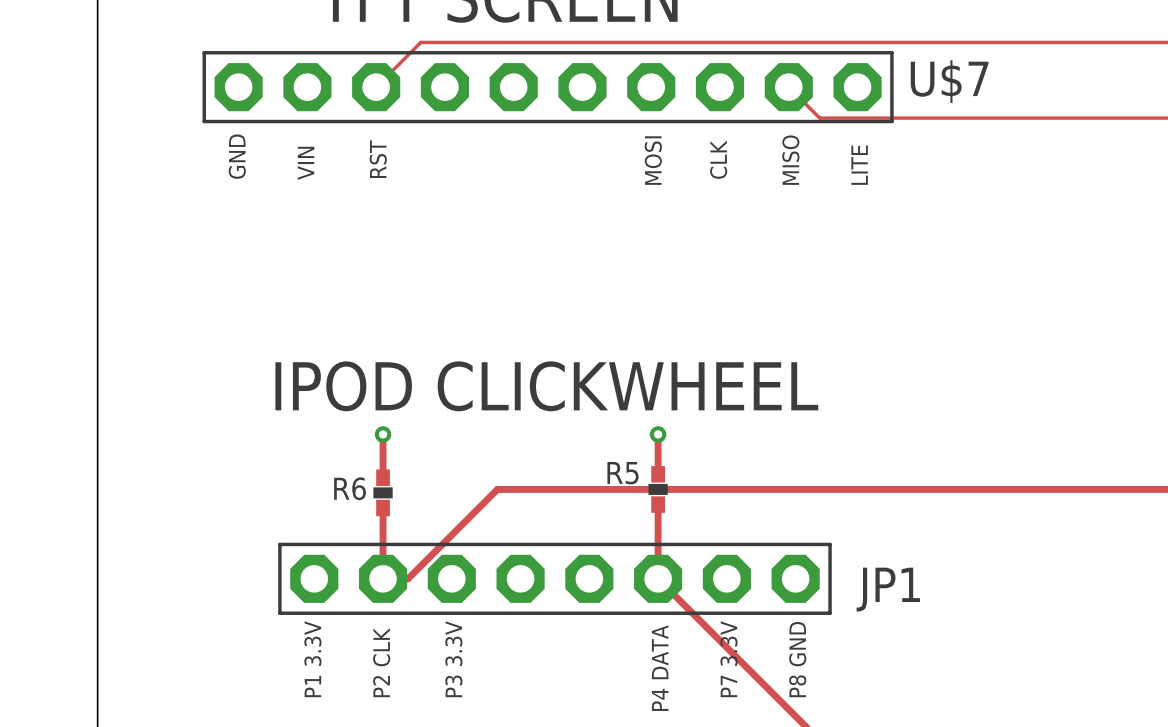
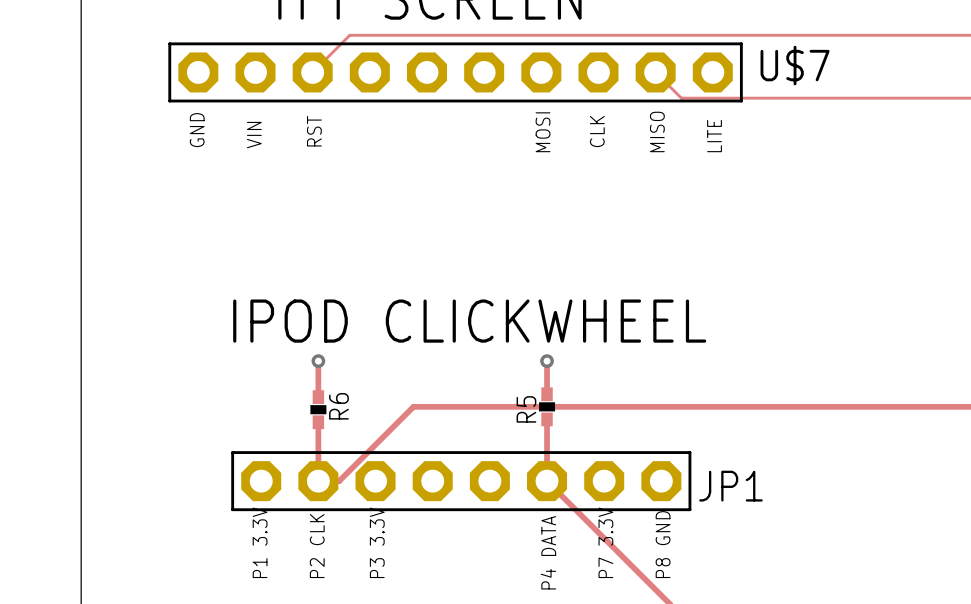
R5 name rotation: 0° (622, 473) -> 90° counterclockwise (526, 409)
R6 name rotation: 0° (350, 488) -> 90° counterclockwise (338, 406)
R6 name position: R6 (350, 488) -> R6 (338, 406)

